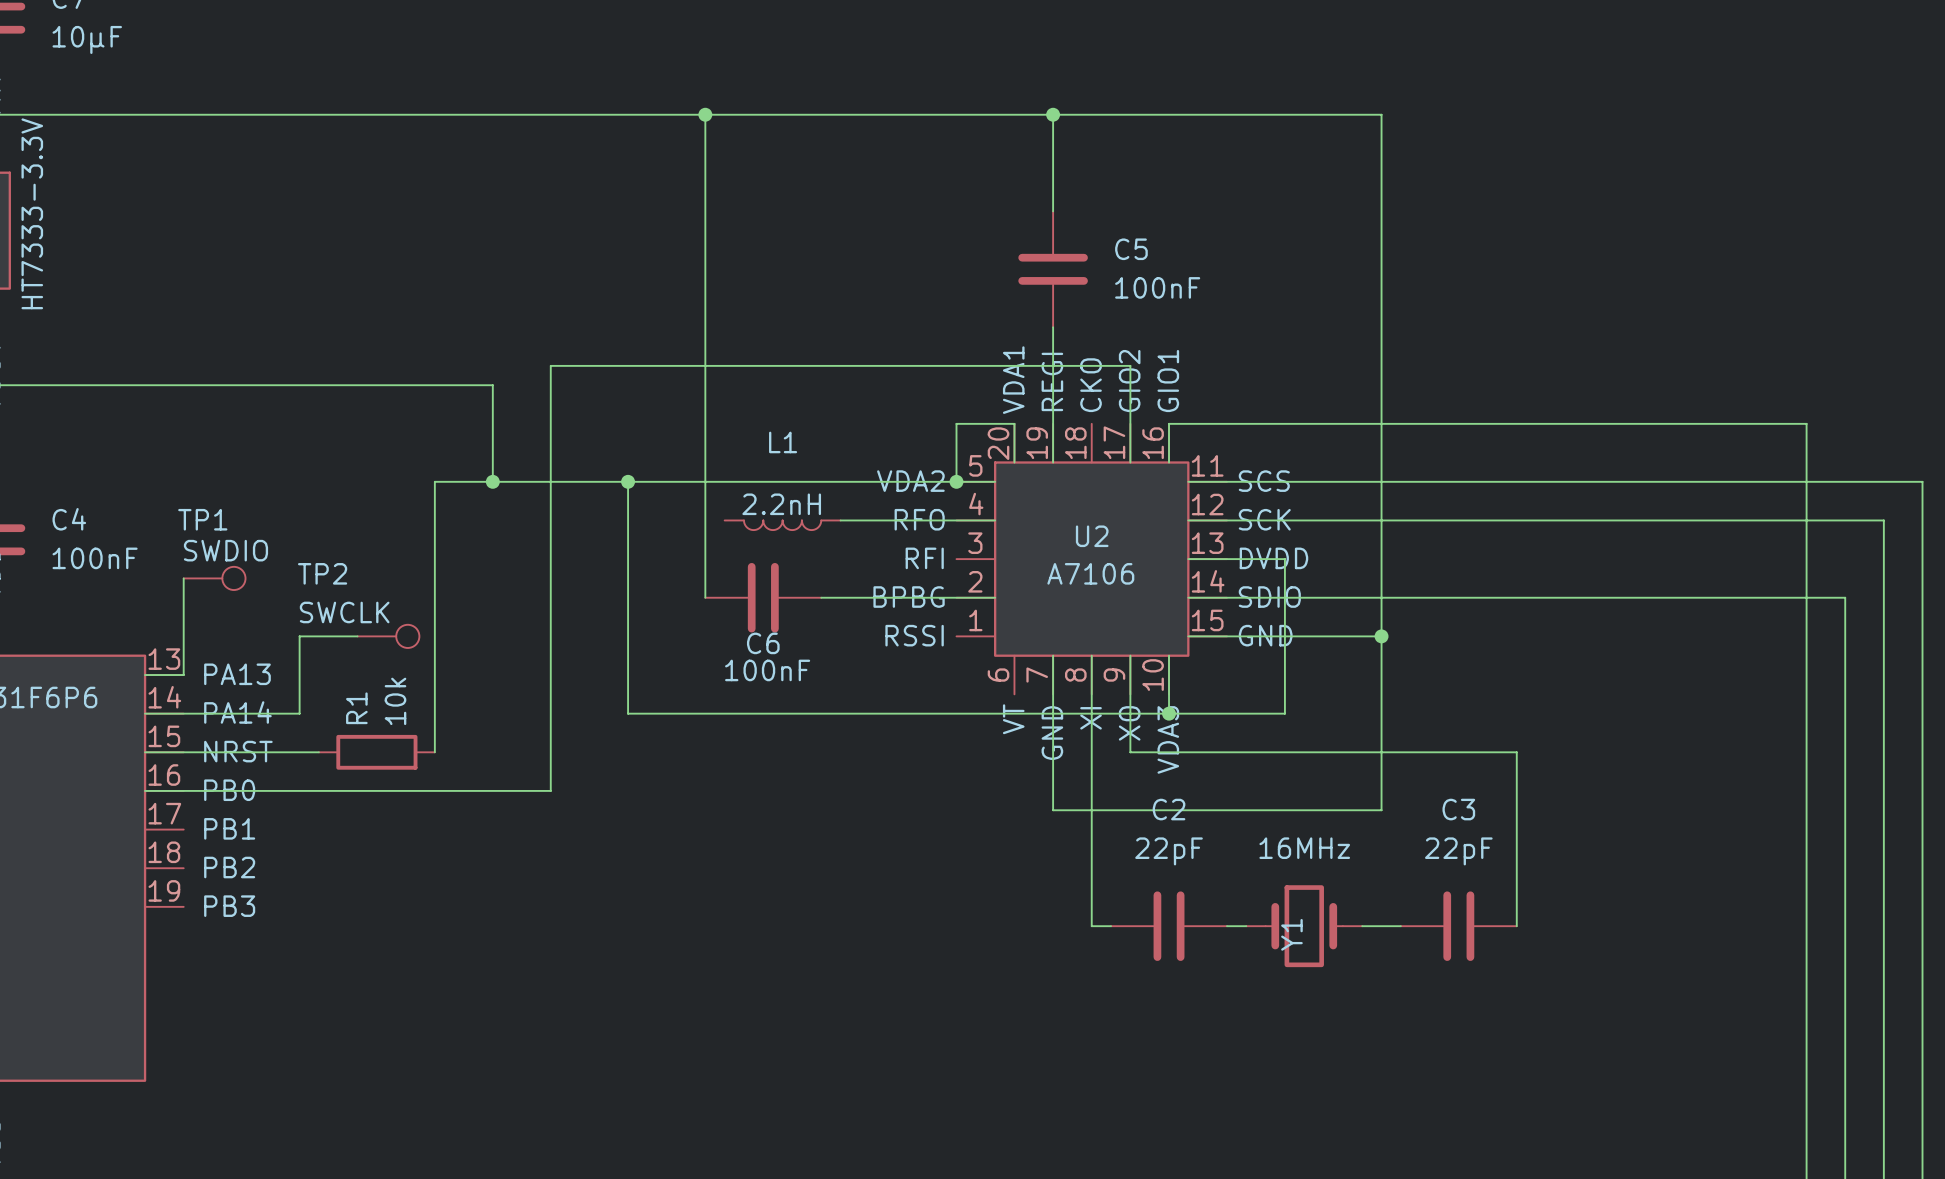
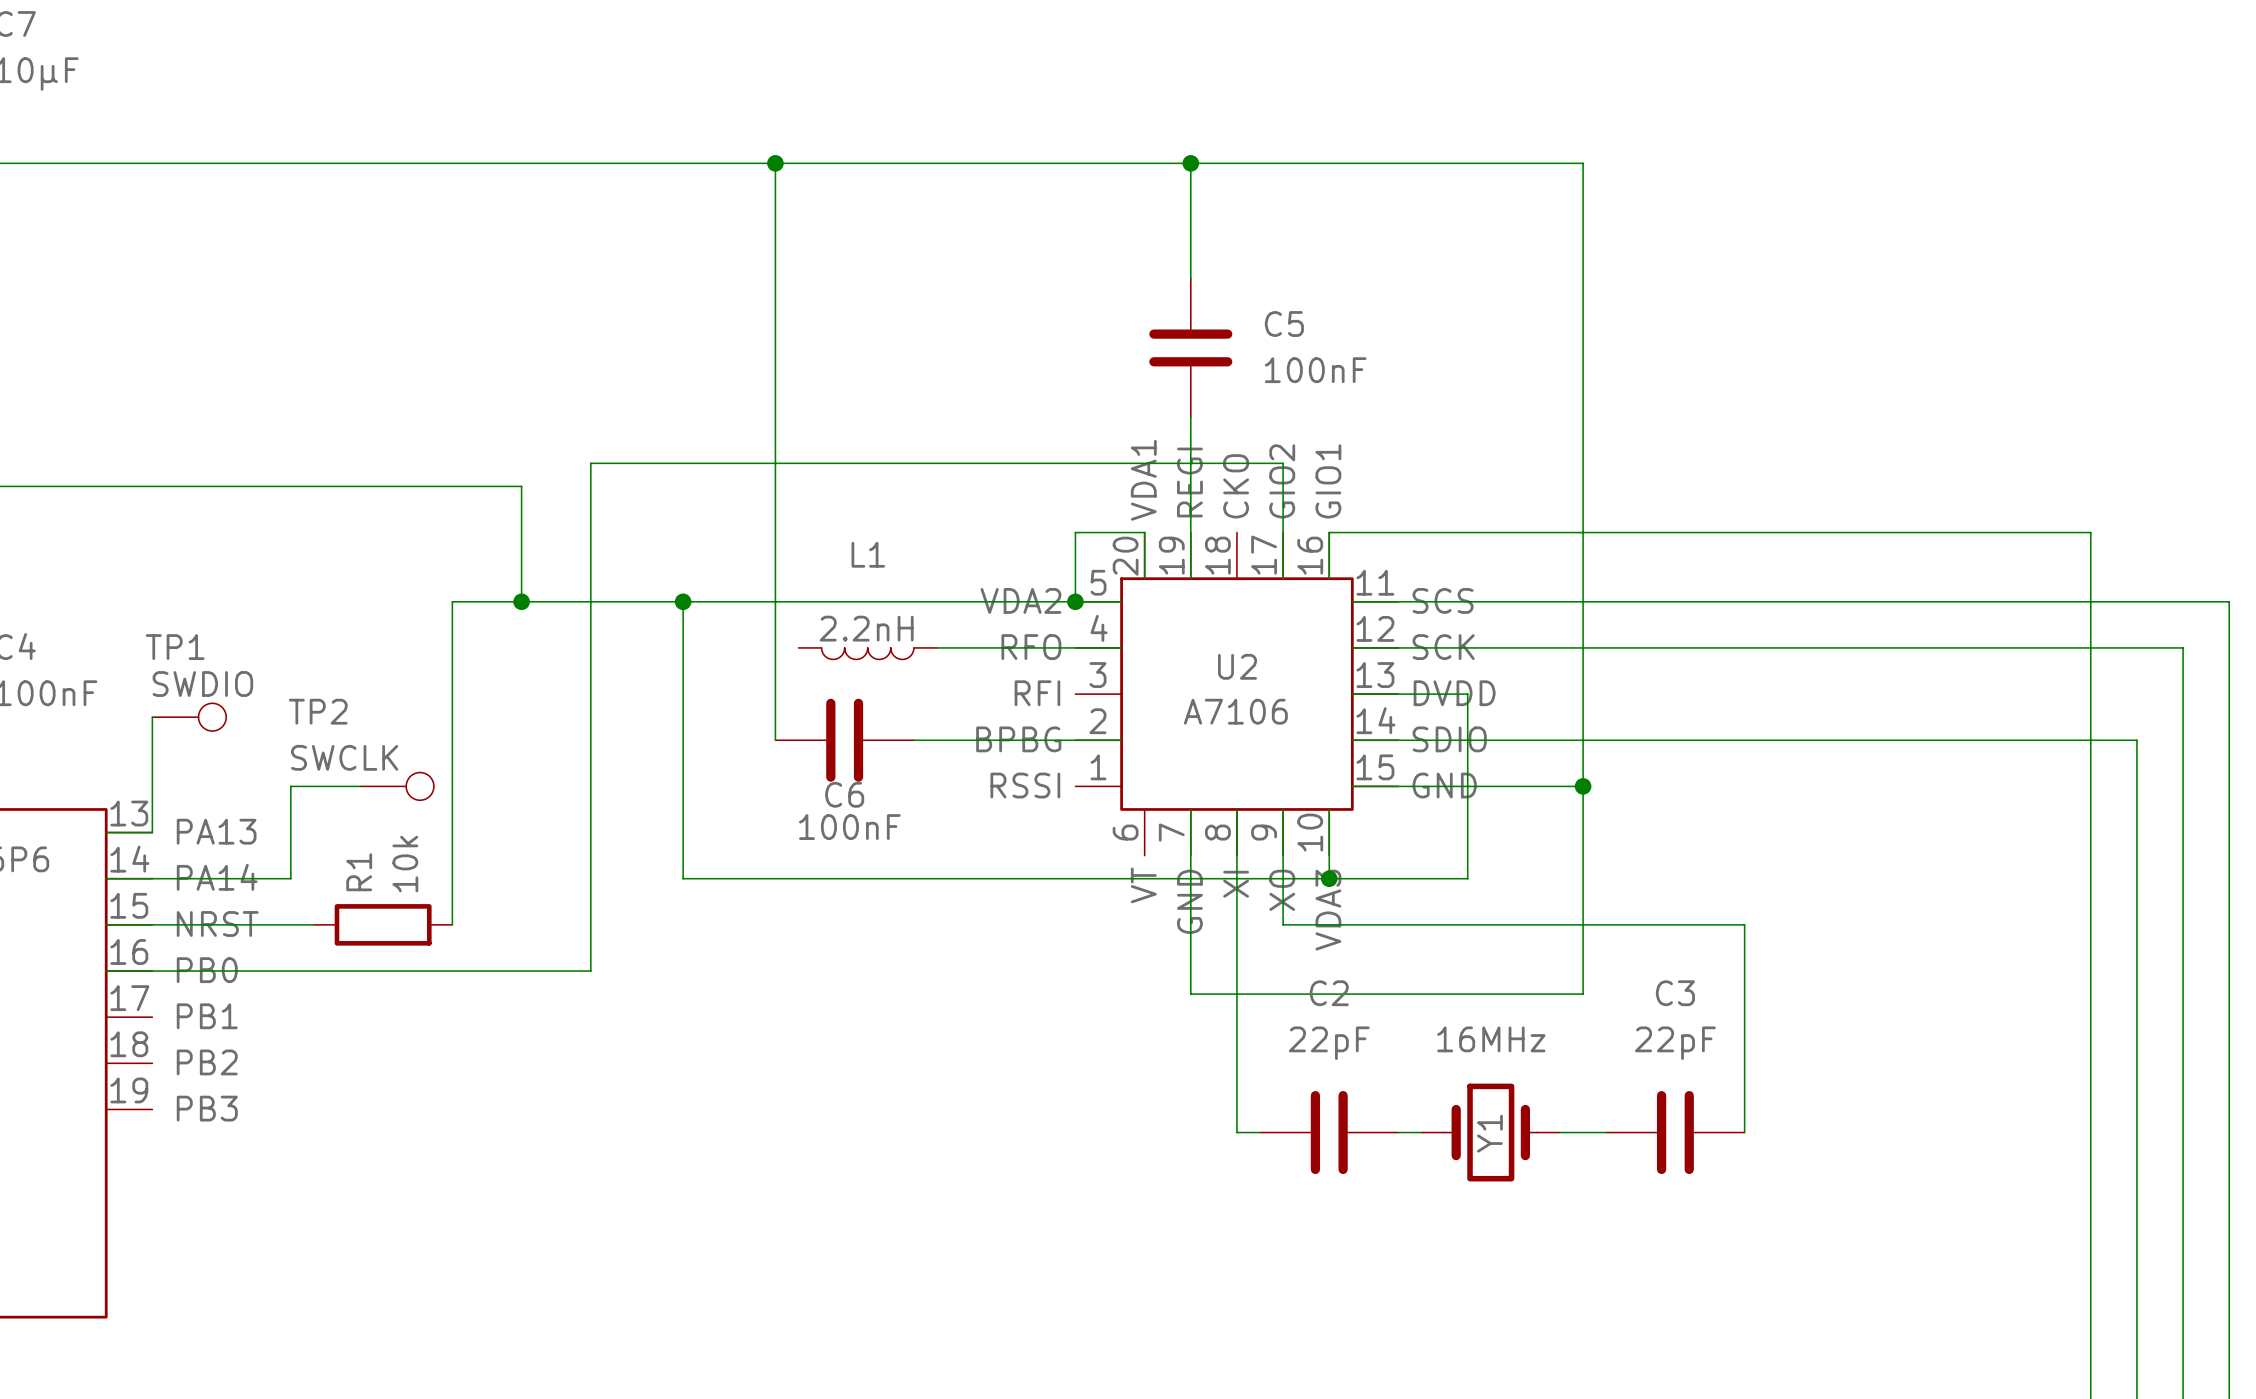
Y1 name position: Y1 (1291, 934) -> Y1 (1489, 1133)

